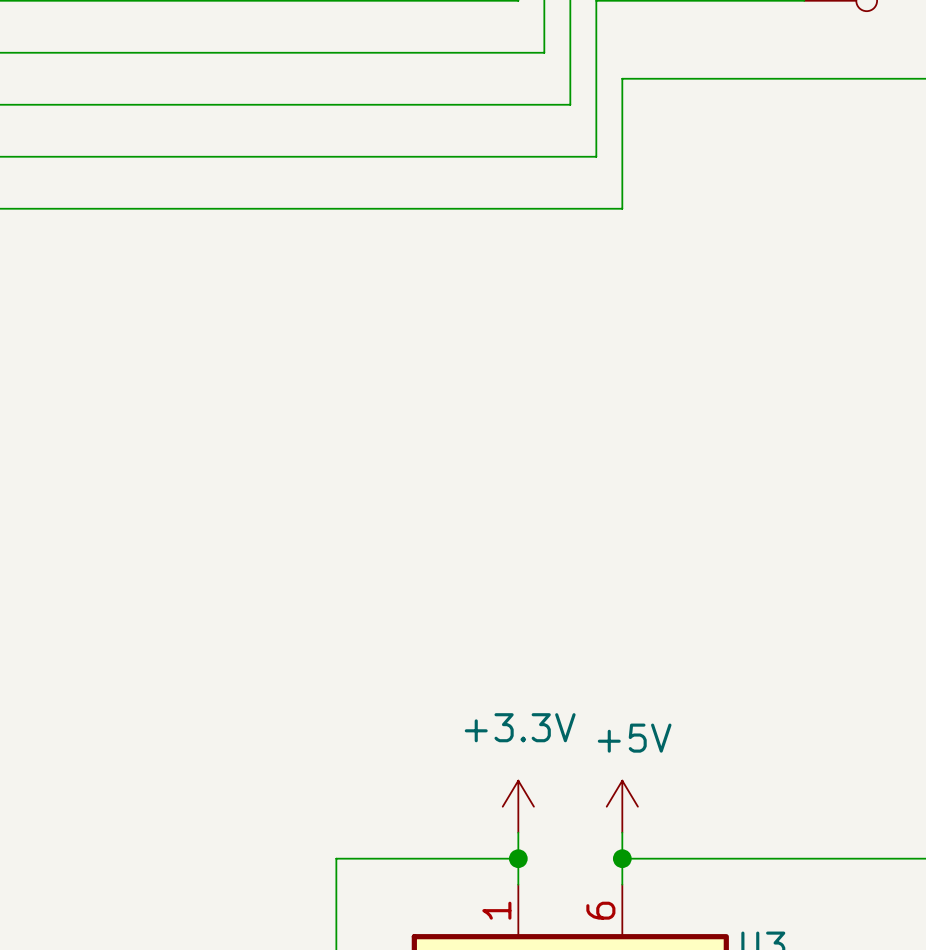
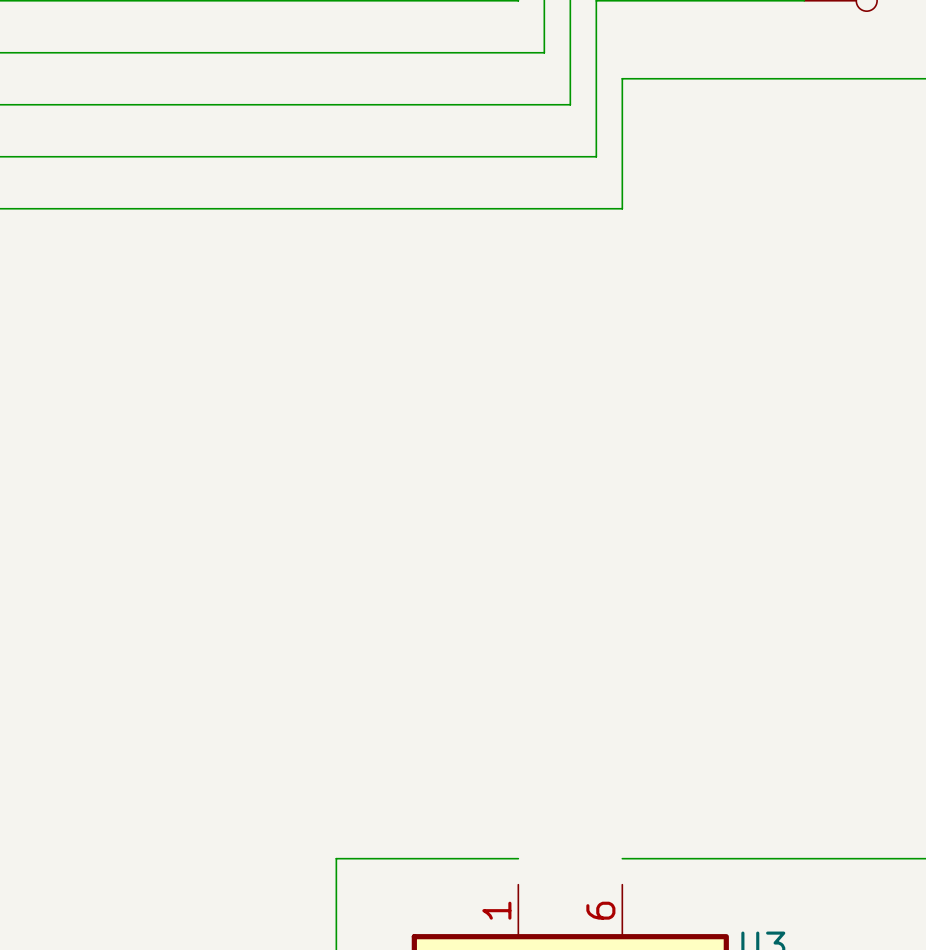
power symbol: +3.3V (518, 806) -> none
power symbol: +5V (622, 806) -> none
wire: (518, 832) (518, 884) -> none
wire: (622, 832) (622, 884) -> none
junction: (518, 858) -> none
junction: (622, 858) -> none

